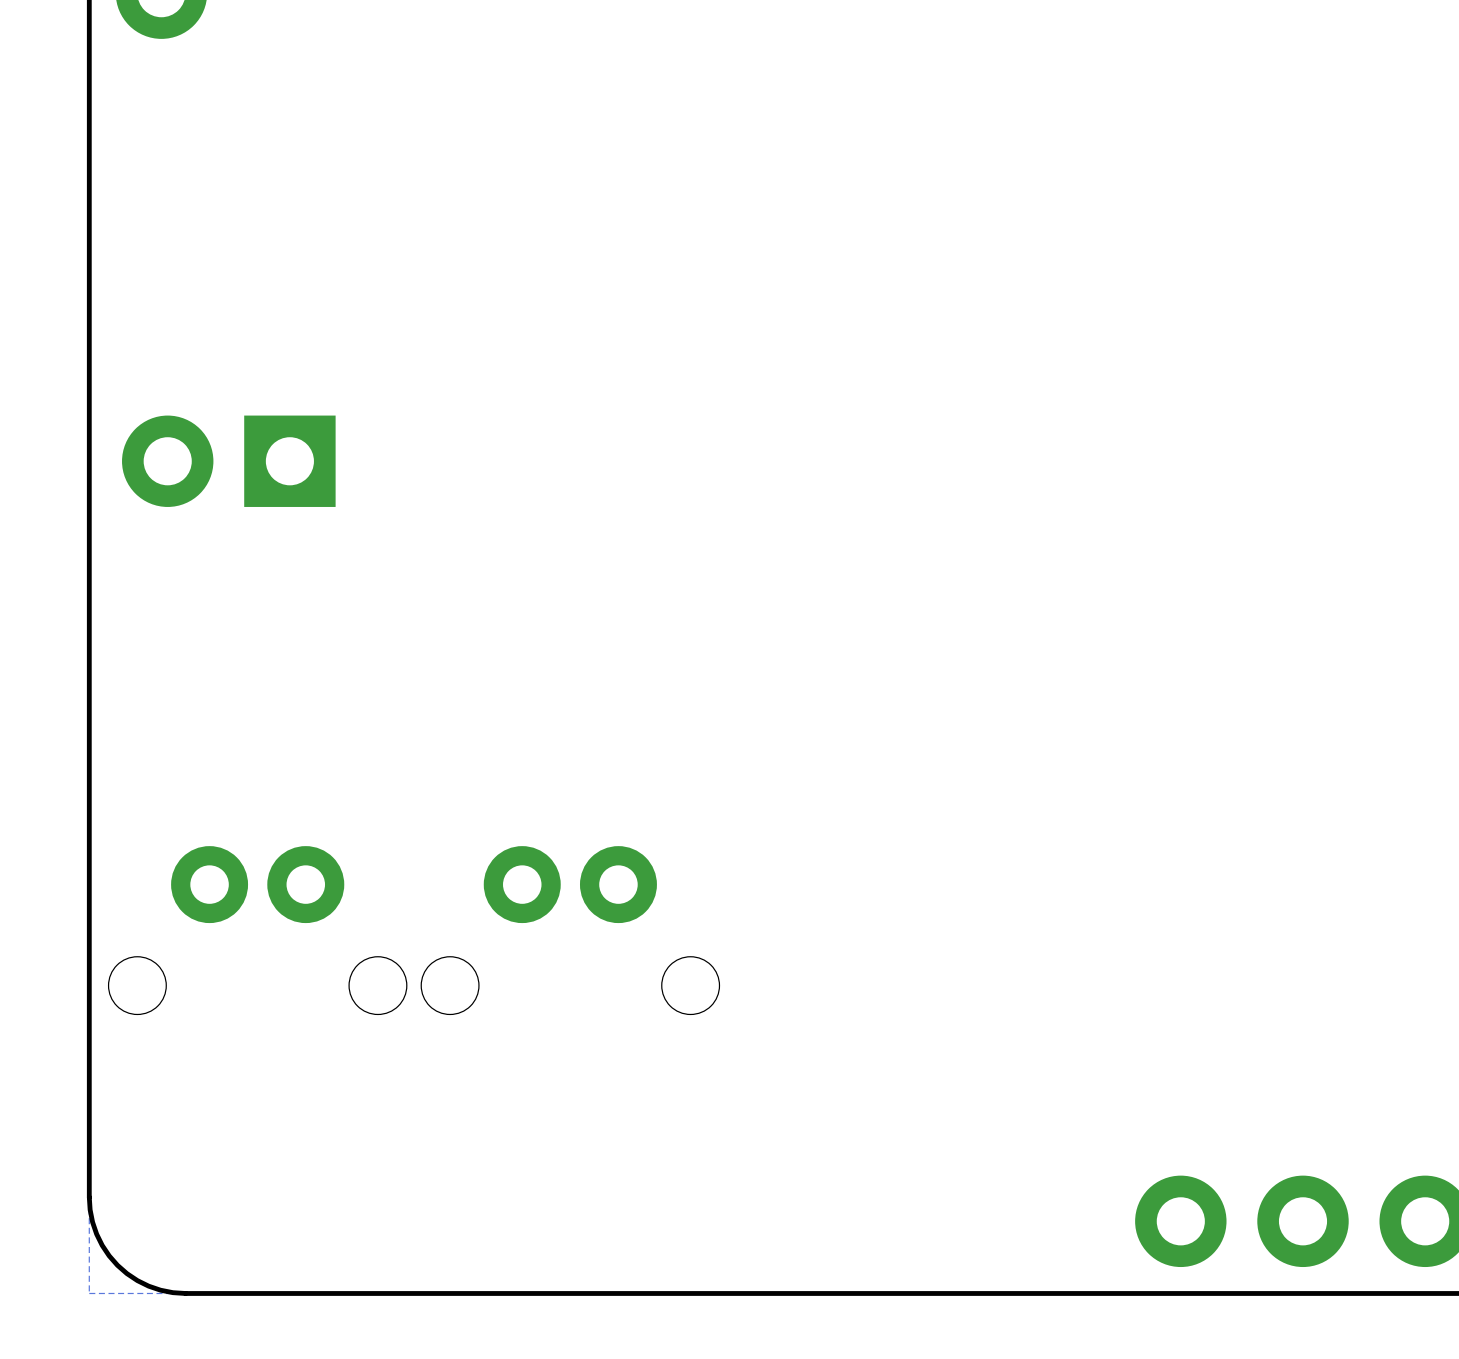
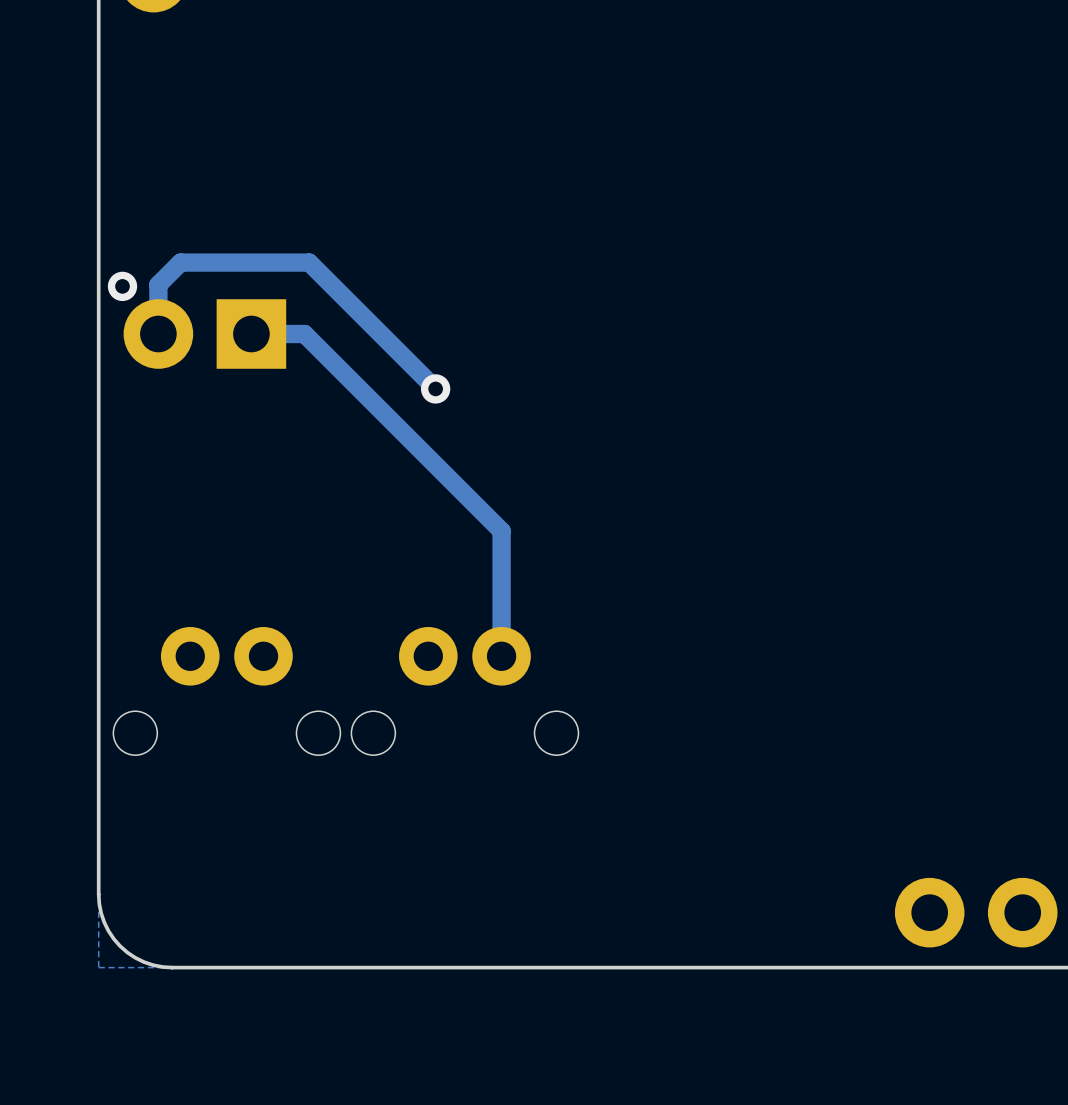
via: none -> (122, 286)
track: none -> (158, 334) (158, 284) (180, 262) (309, 262) (435, 388)
track: none -> (251, 334) (304, 334) (501, 531) (501, 656)
via: none -> (435, 388)

